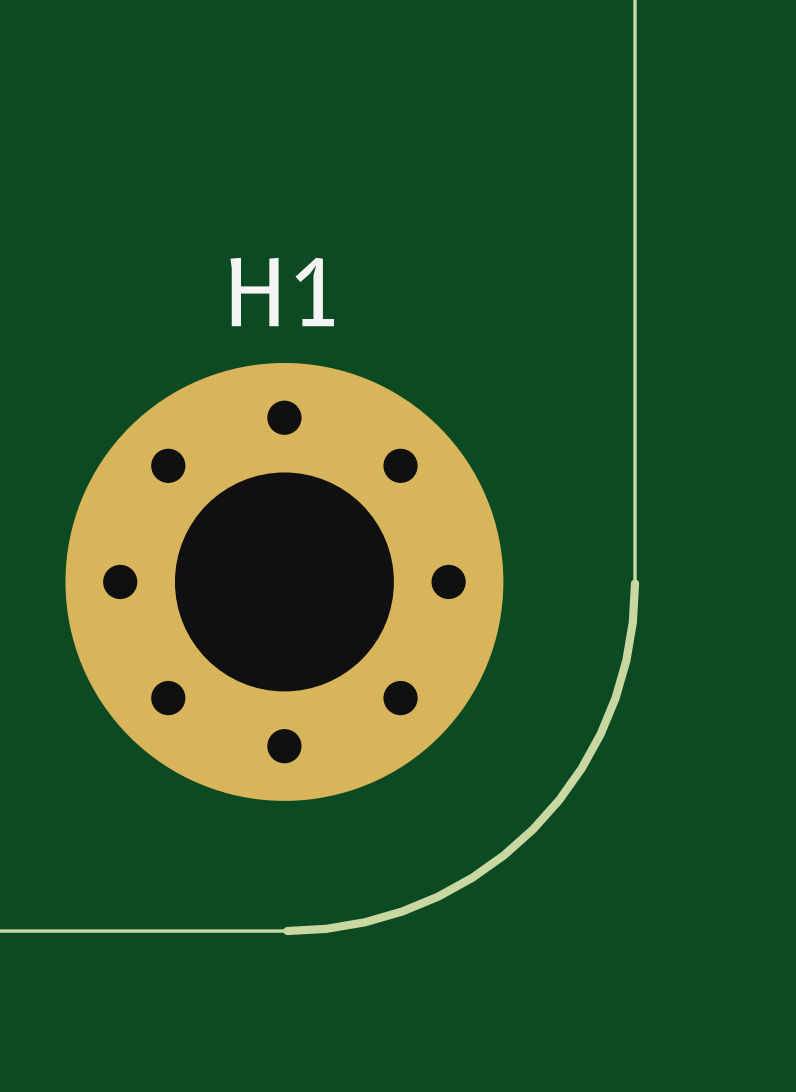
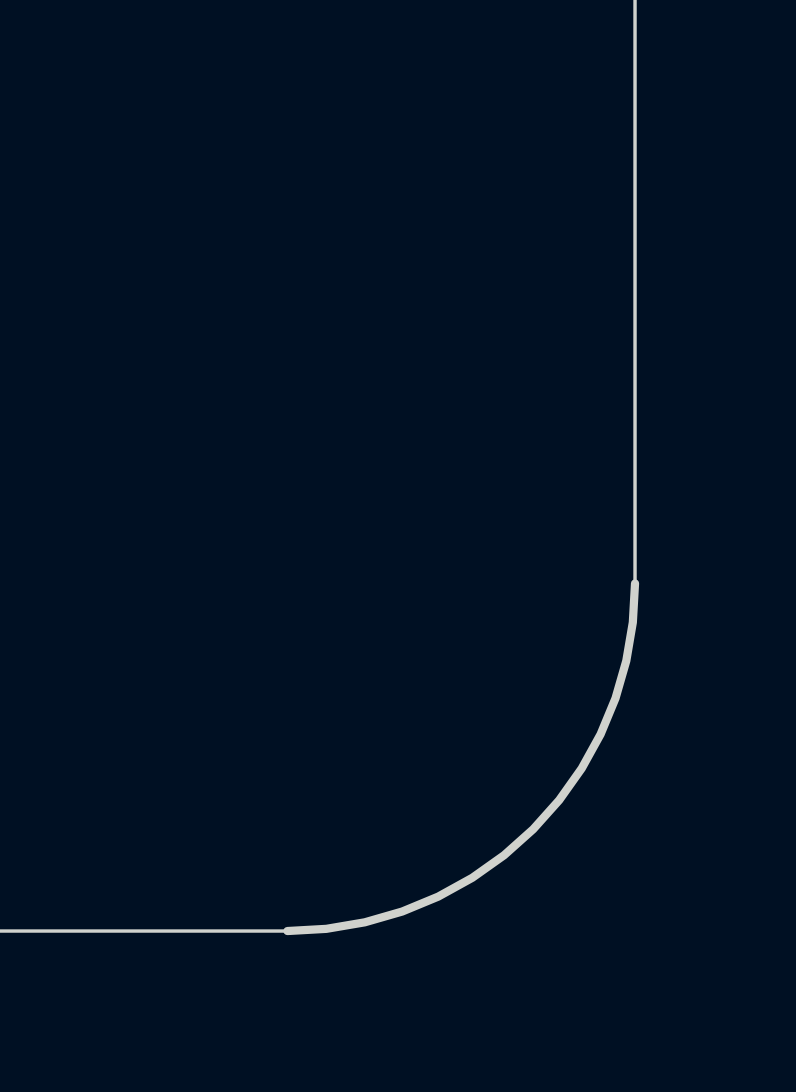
H1: (284, 581) -> none

